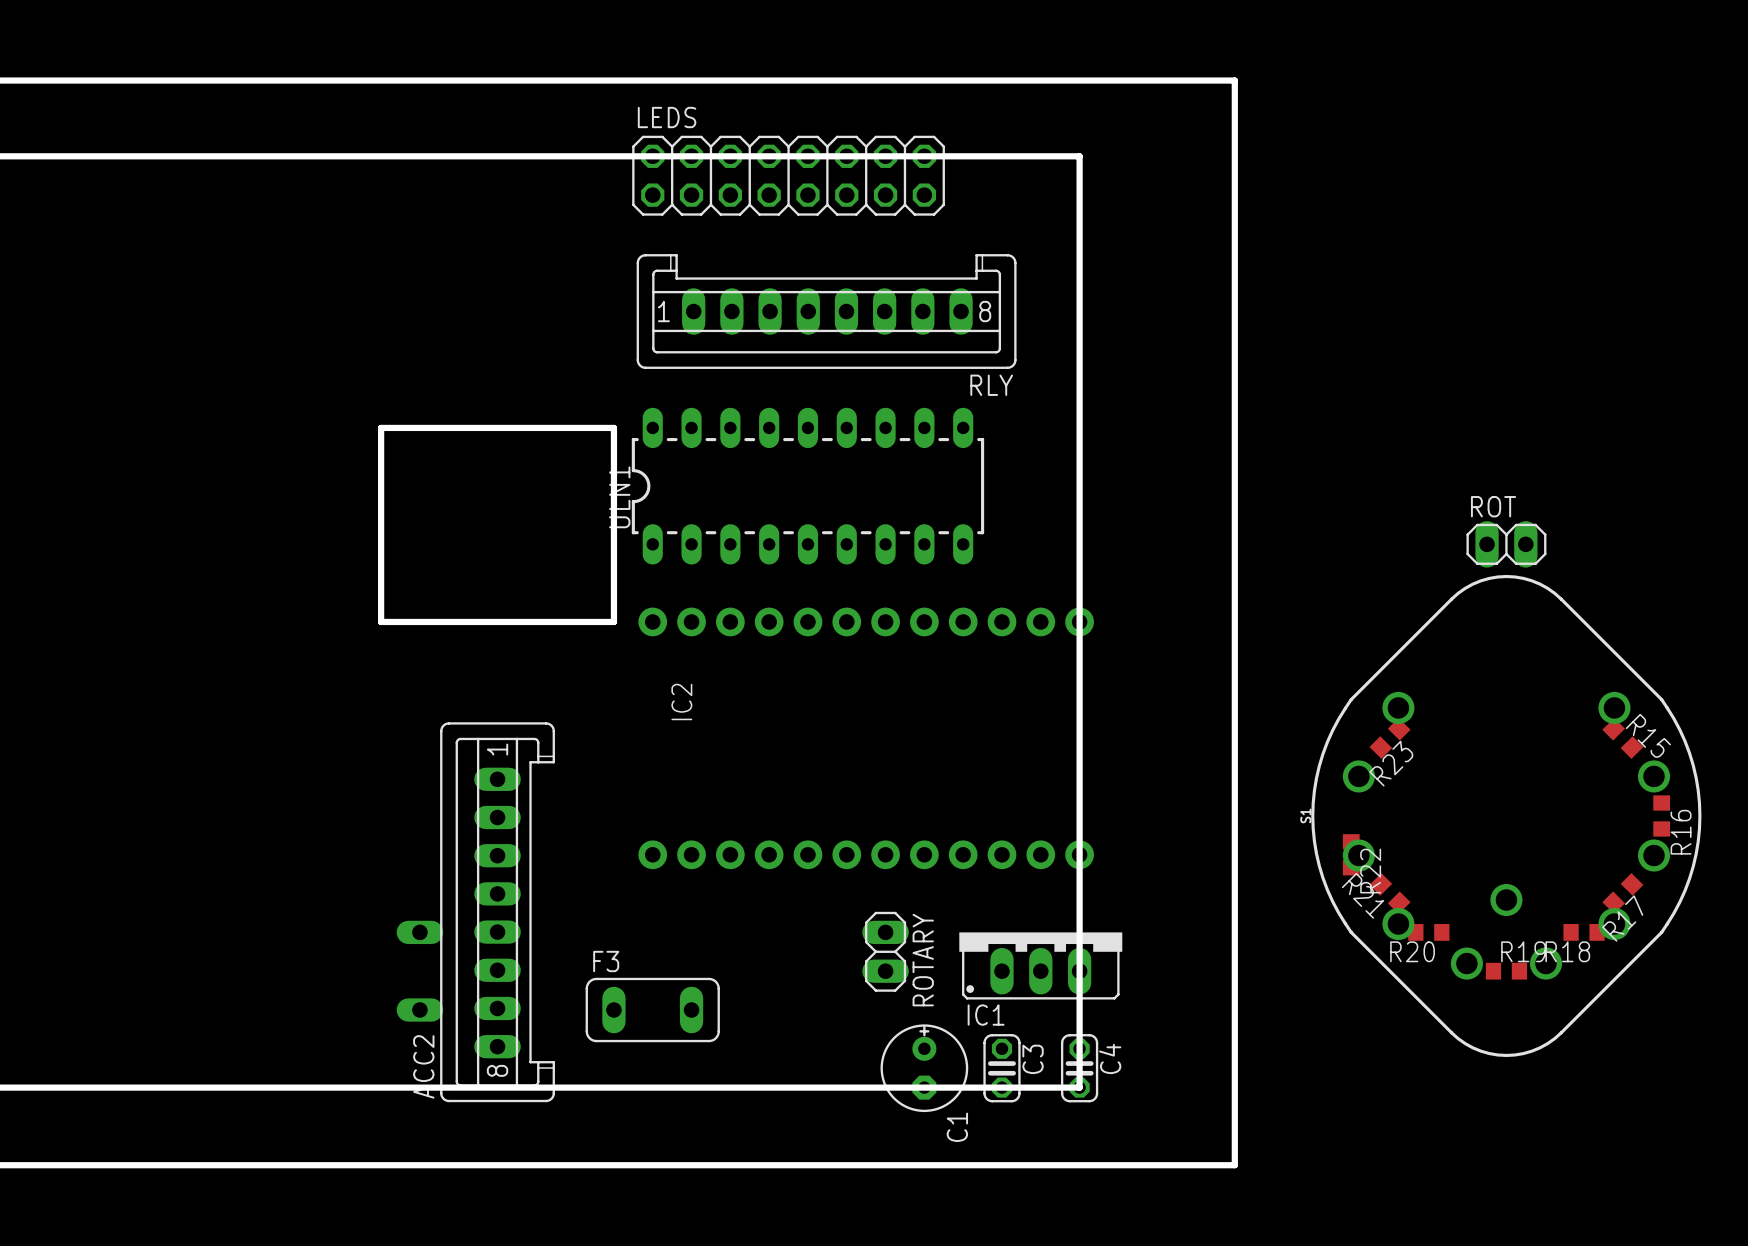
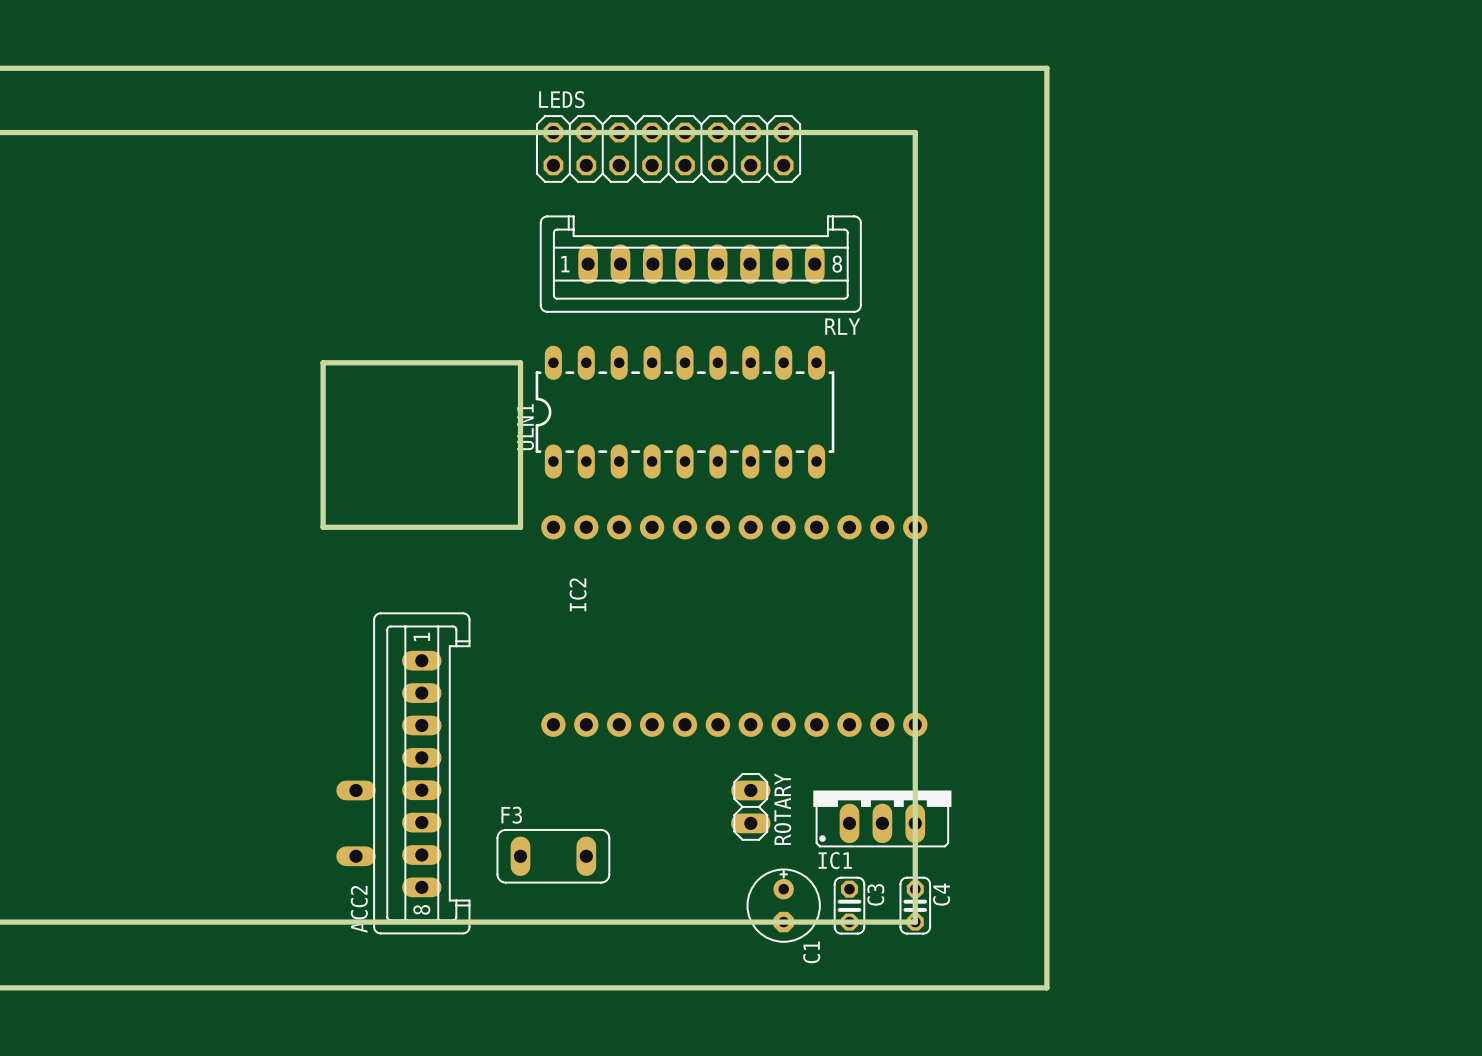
ROT: (1506, 544) -> none
R23: (1390, 738) -> none
R15: (1622, 738) -> none
S1: (1506, 815) -> none
R16: (1661, 815) -> none
R22: (1351, 854) -> none
R21: (1390, 893) -> none
R17: (1622, 893) -> none
R20: (1428, 932) -> none
R18: (1584, 932) -> none
R19: (1506, 971) -> none

